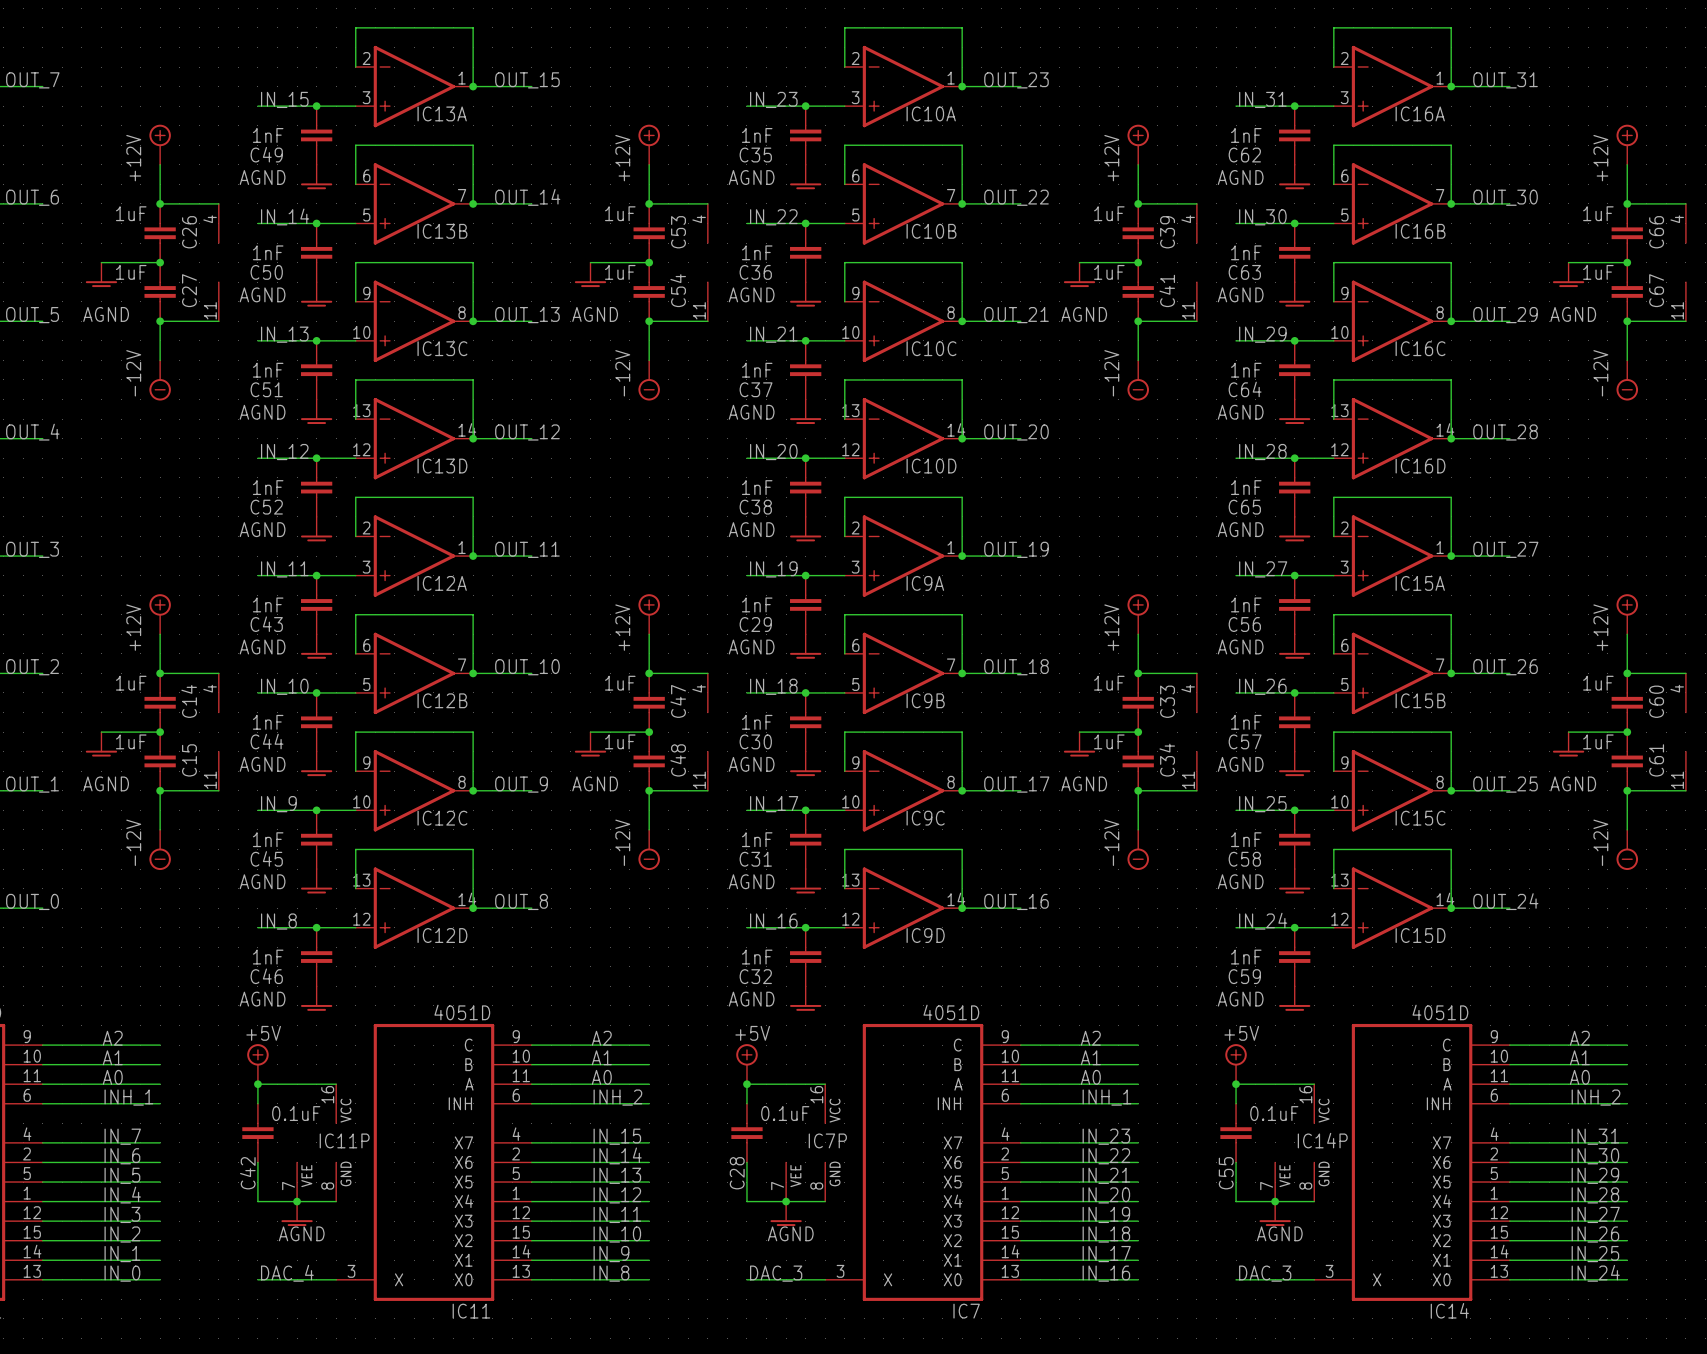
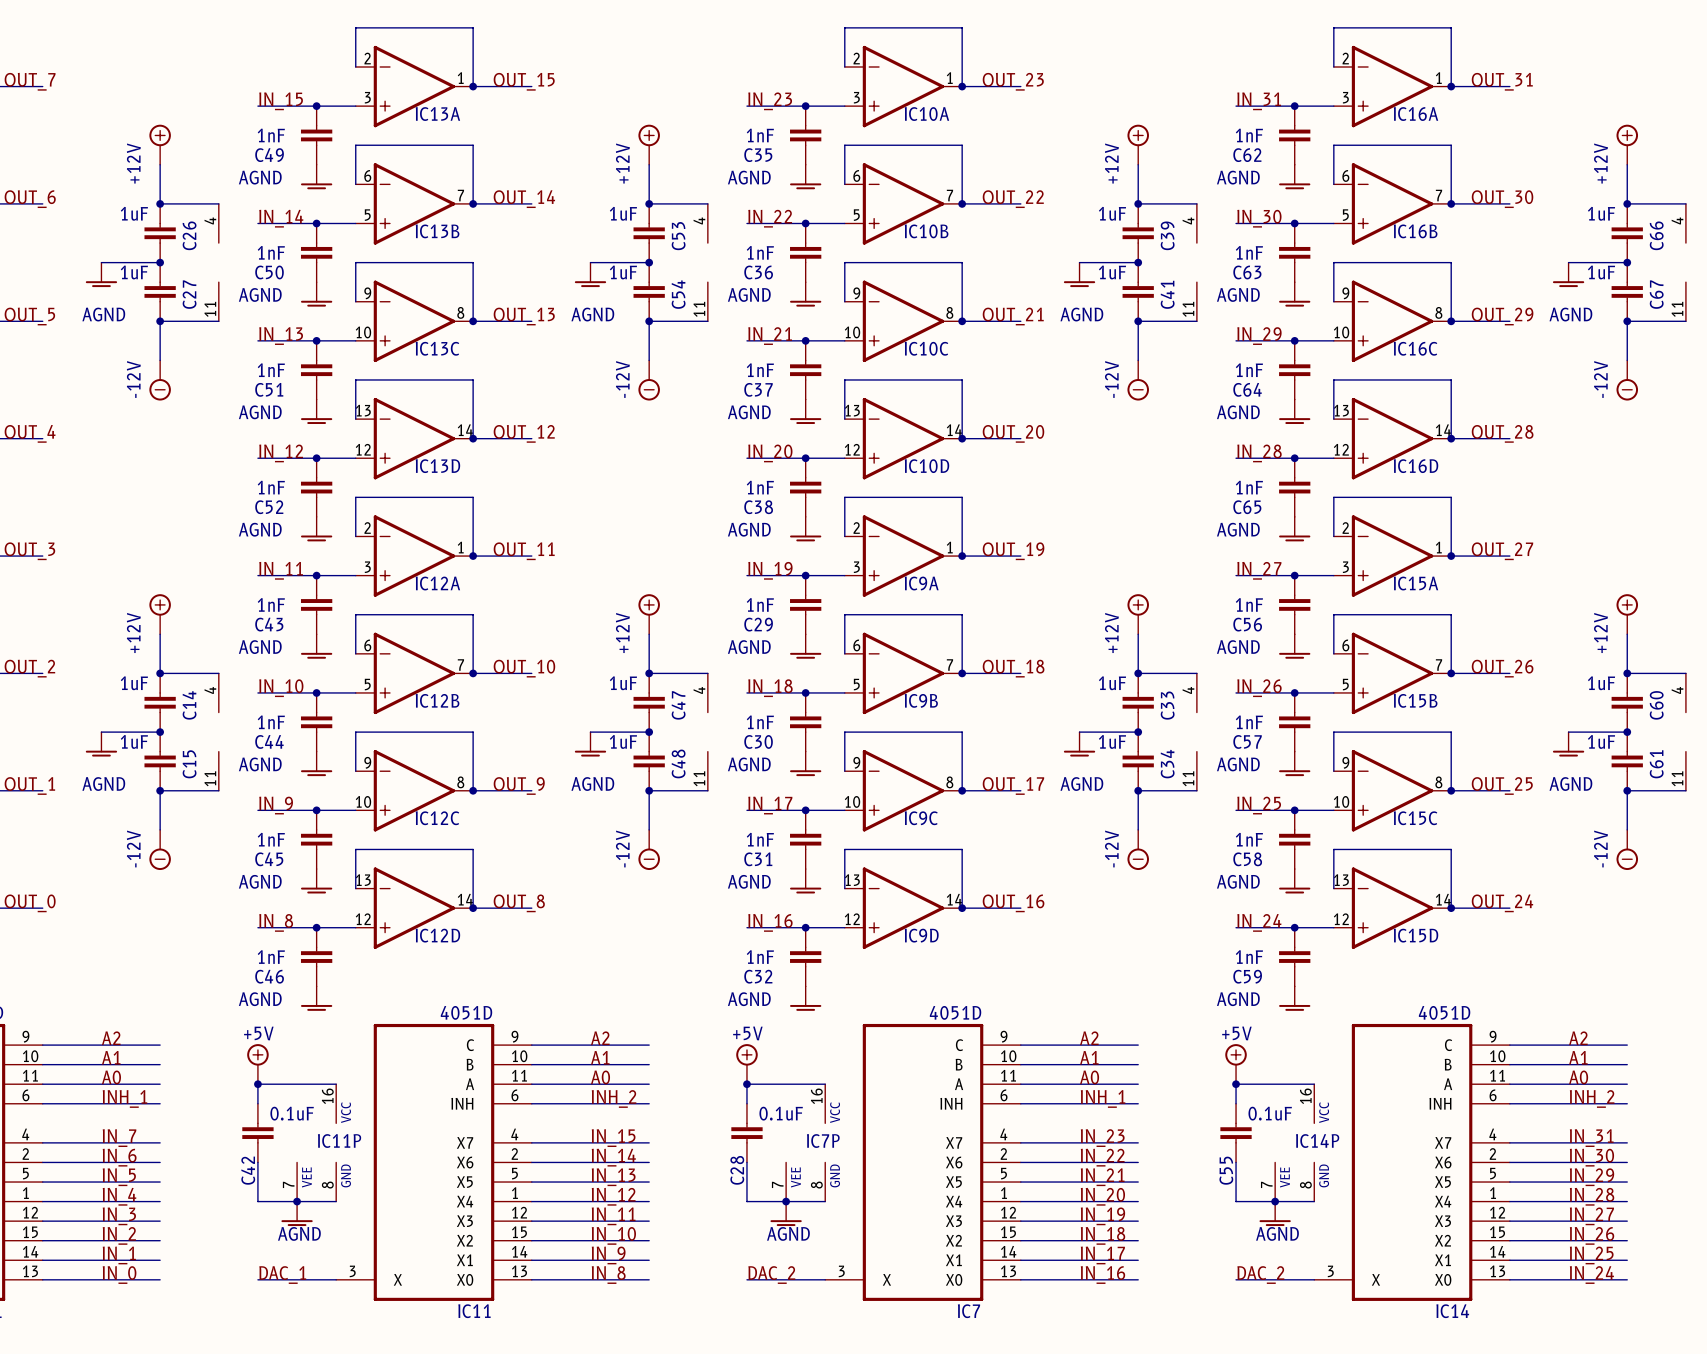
label: DAC_4 (287, 1273) -> DAC_1 (282, 1275)
label: DAC_3 (776, 1273) -> DAC_2 (771, 1275)
label: DAC_3 (1265, 1273) -> DAC_2 (1260, 1275)

